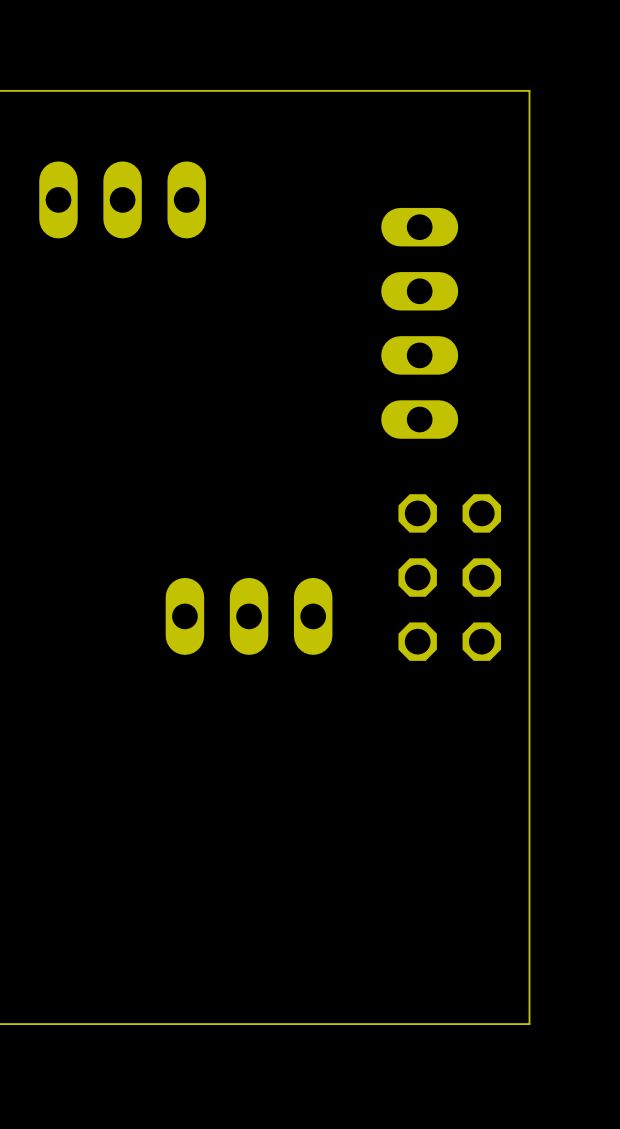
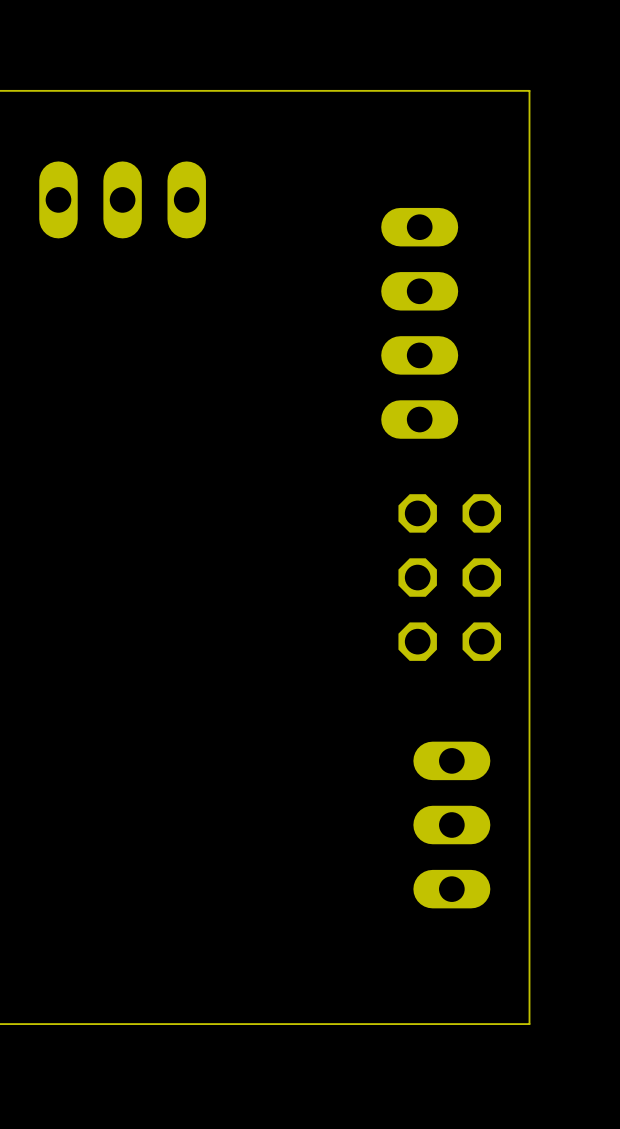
part rotation: 0° (249, 616) -> 90° clockwise (451, 825)
part position: (249, 616) -> (451, 825)

